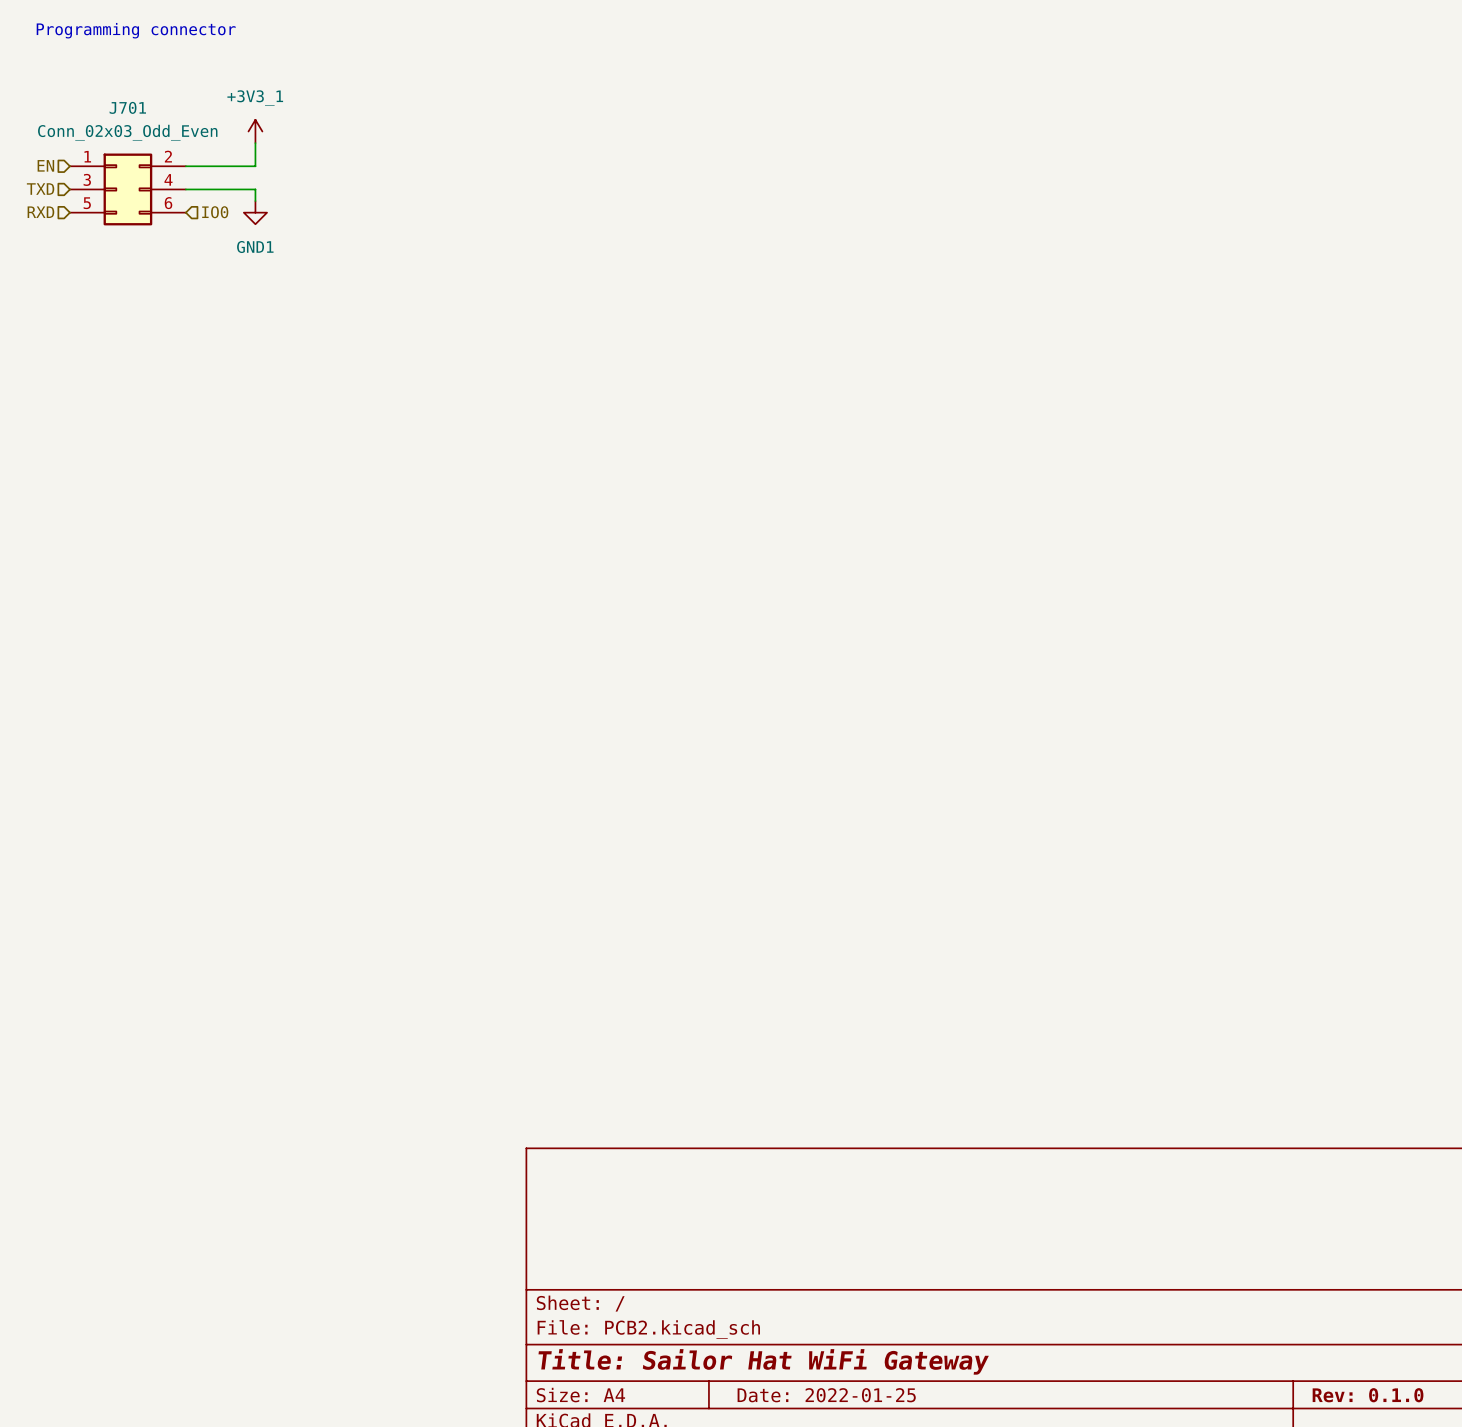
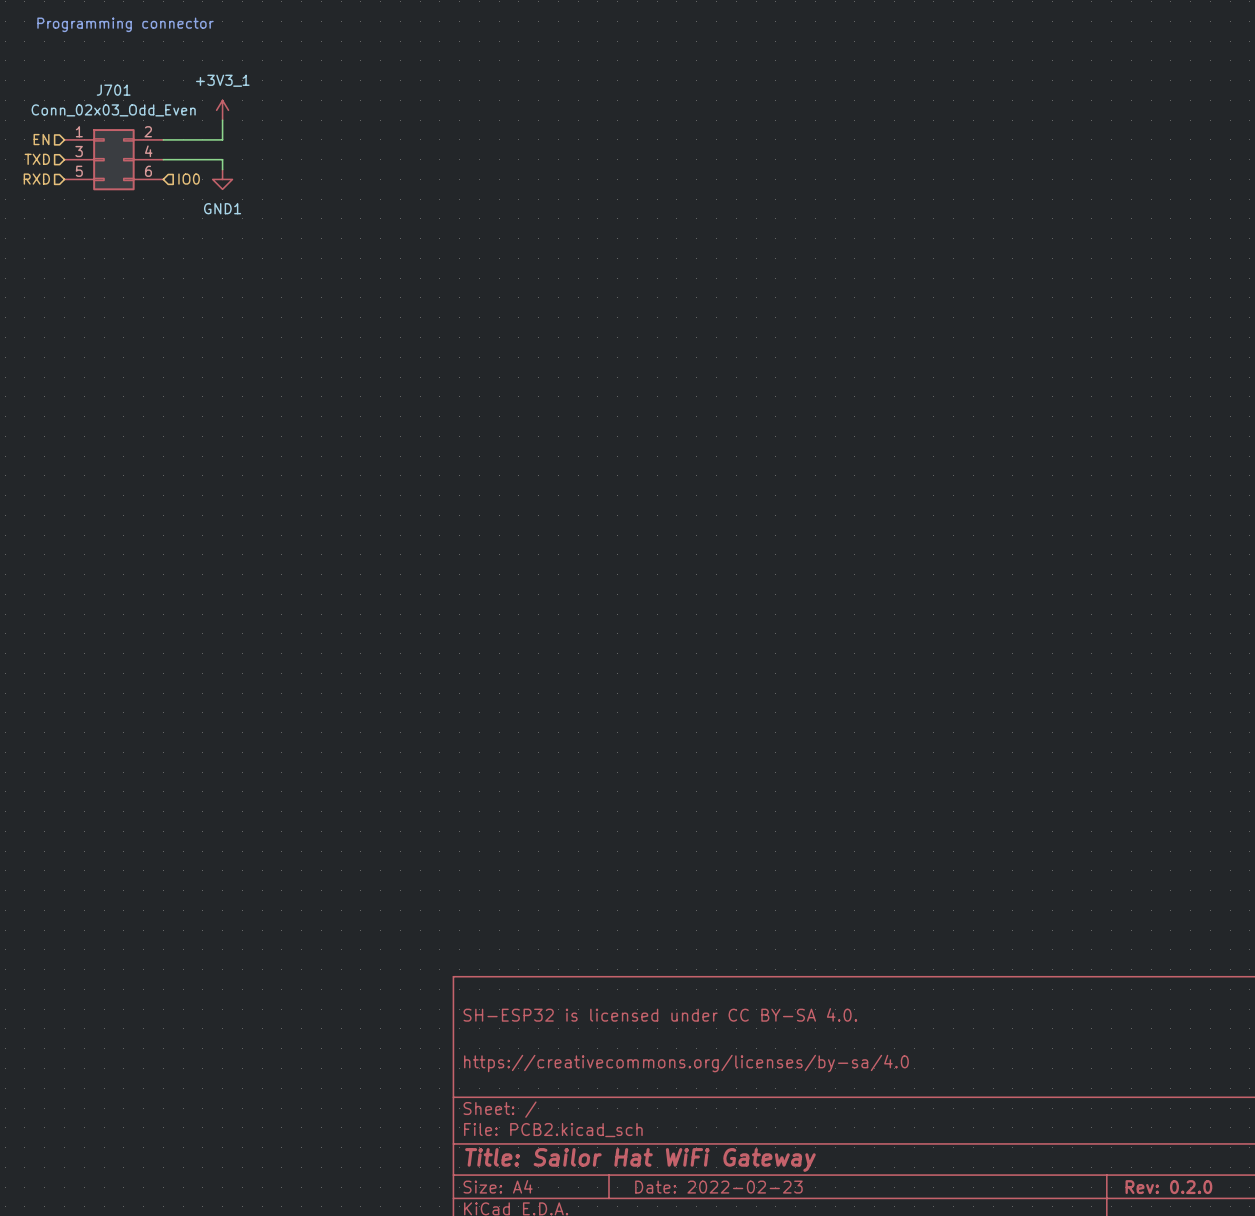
title block: none -> SH-ESP32 is licensed under CC BY-SA 4.0. (660, 1014)
title block: none -> https://creativecommons.org/licenses/by-sa/4.0 (686, 1063)
title block: Date: 2022-01-25 (826, 1395) -> Date: 2022-02-23 (718, 1187)
title block: Rev: 0.1.0 (1368, 1395) -> Rev: 0.2.0 (1168, 1187)

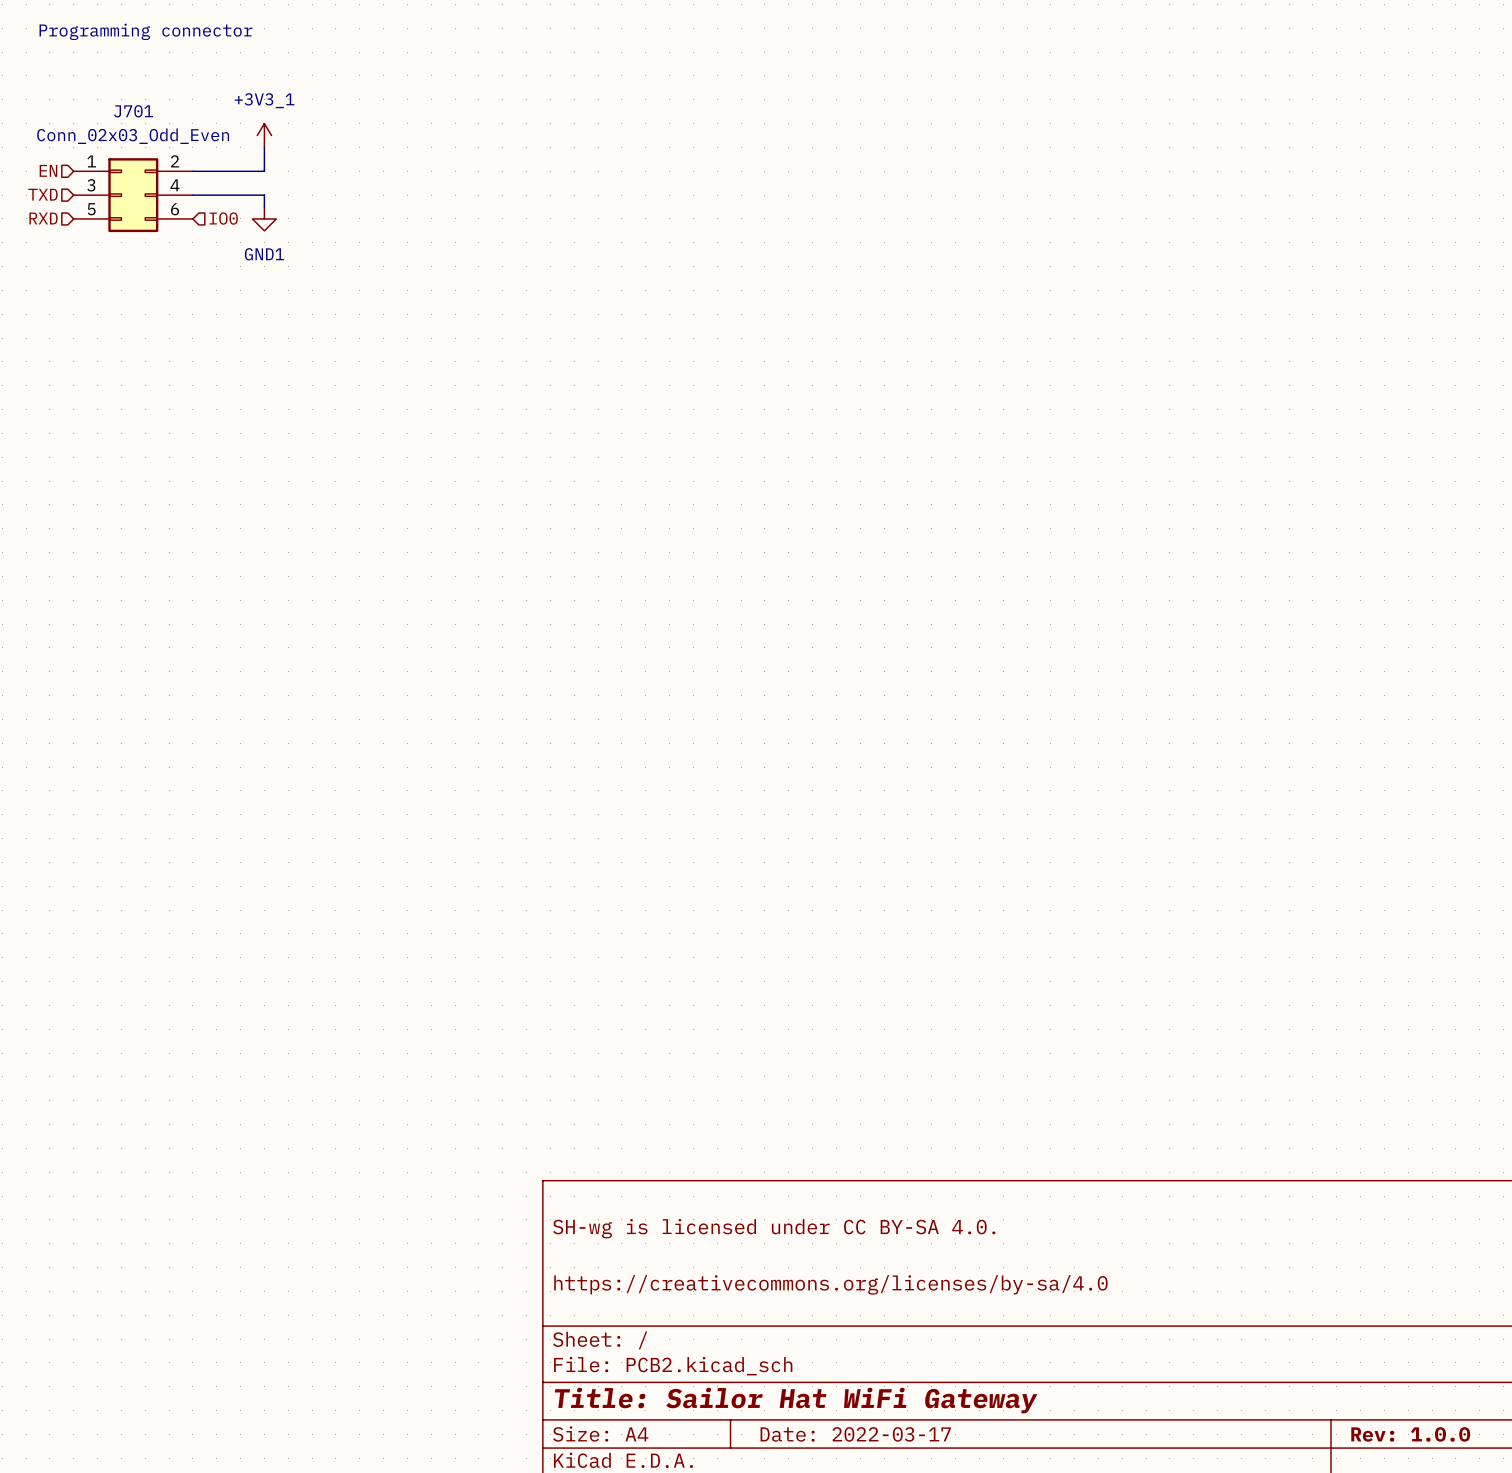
title block: SH-ESP32 is licensed under CC BY-SA 4.0. (660, 1014) -> SH-wg is licensed under CC BY-SA 4.0. (774, 1228)
title block: Date: 2022-02-23 (718, 1187) -> Date: 2022-03-17 (855, 1434)
title block: Rev: 0.2.0 (1168, 1187) -> Rev: 1.0.0 (1410, 1434)

